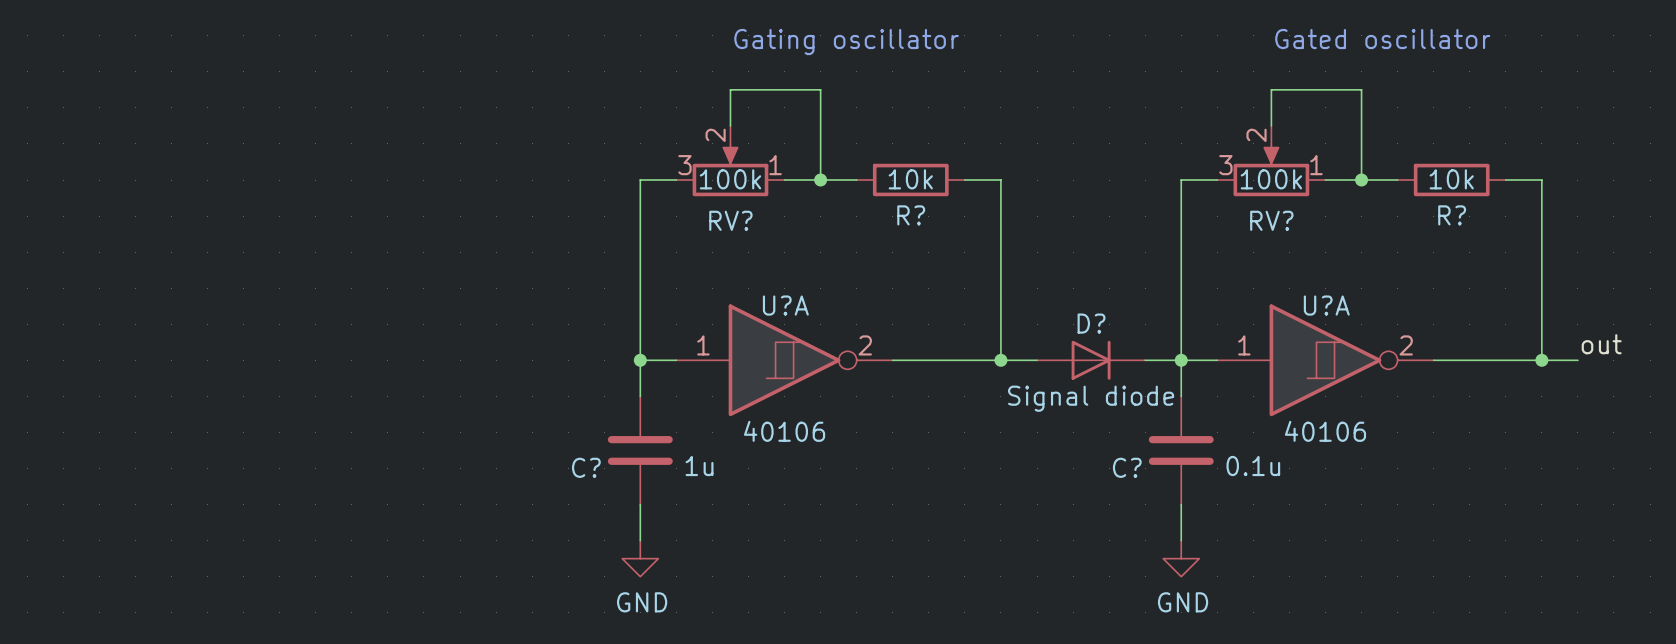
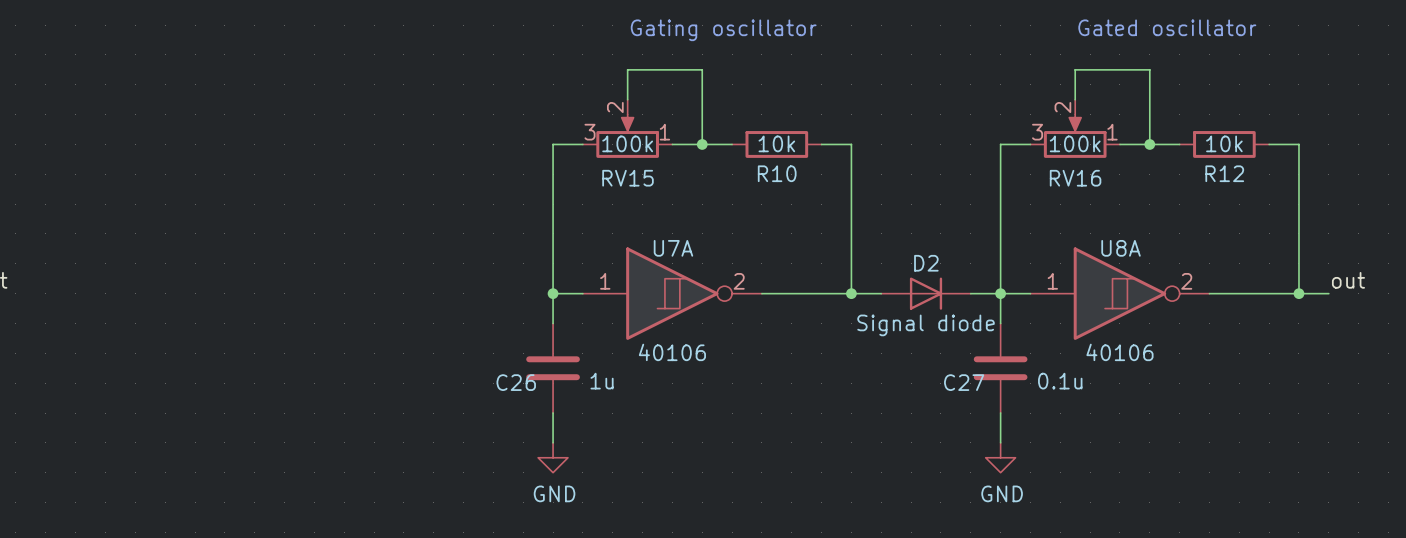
R? name: R? (911, 215) -> R10 (777, 173)
R? name: R? (1452, 215) -> R12 (1224, 173)
RV? name: RV? (730, 220) -> RV15 (628, 178)
RV? name: RV? (1271, 220) -> RV16 (1075, 178)
U?A name: U?A (785, 305) -> U7A (673, 248)
U?A name: U?A (1326, 305) -> U8A (1121, 248)
D? name: D? (1091, 323) -> D2 (926, 263)
C? name: C? (586, 467) -> C26 (516, 382)
C? name: C? (1127, 467) -> C27 (964, 382)

